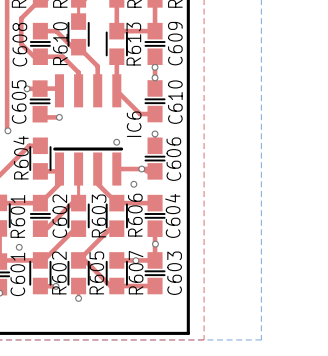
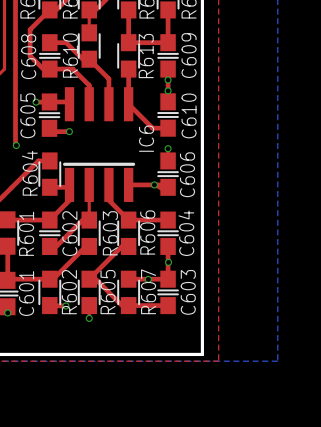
via: (116, 142) -> none
via: (133, 184) -> none
via: (19, 247) -> none

